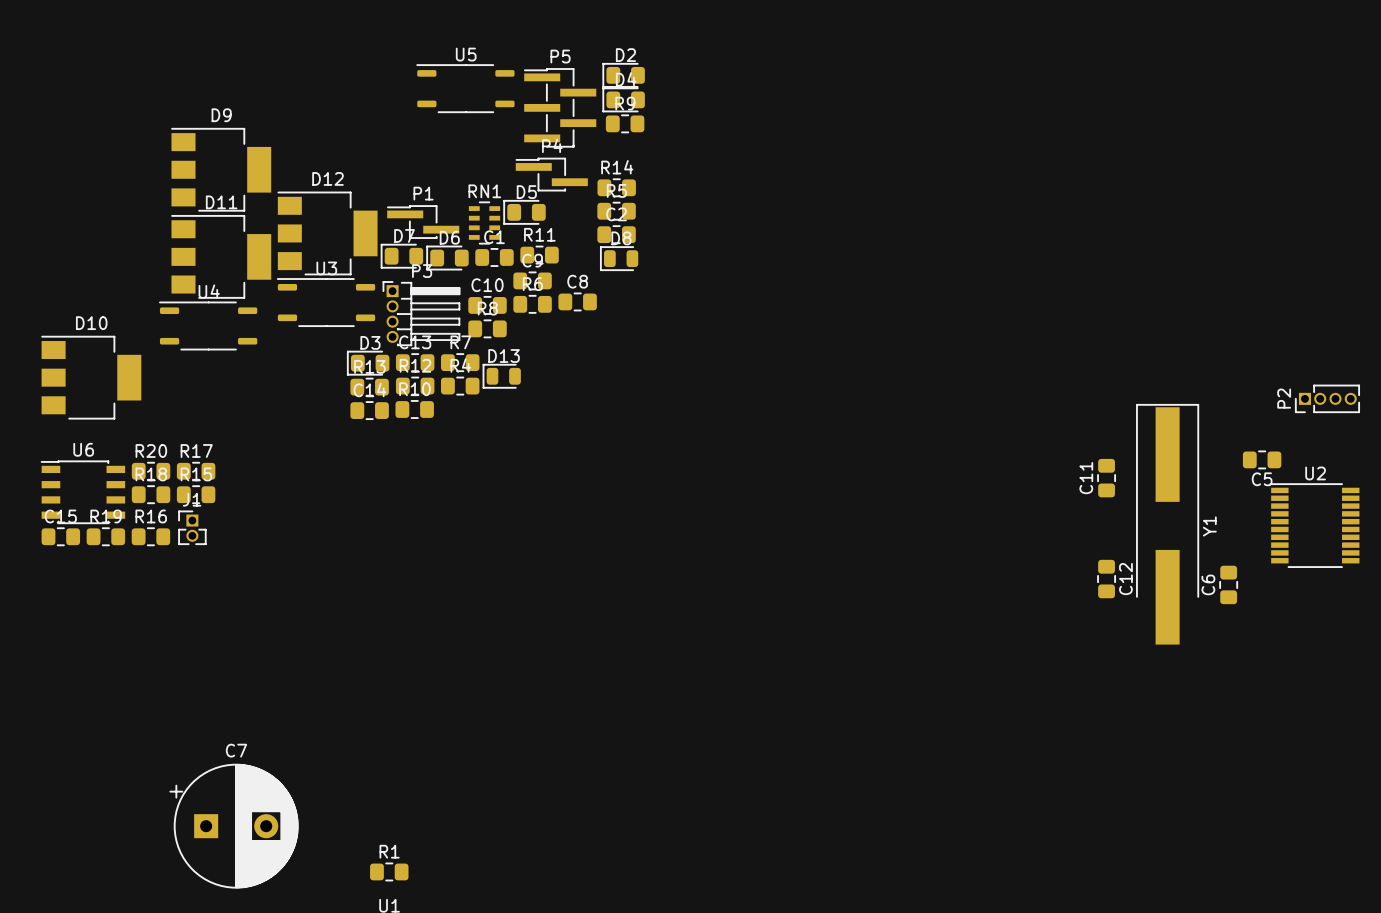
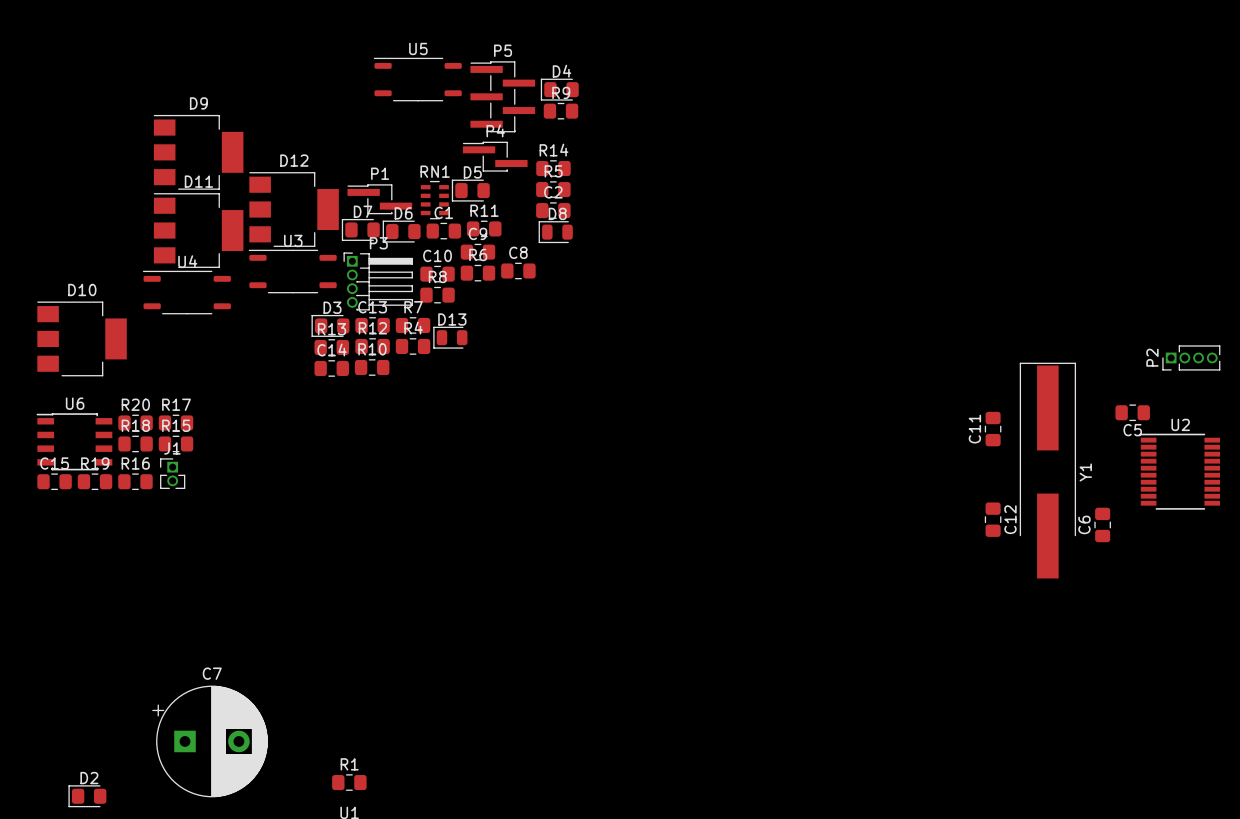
D2 position: (623, 75) -> (87, 796)

